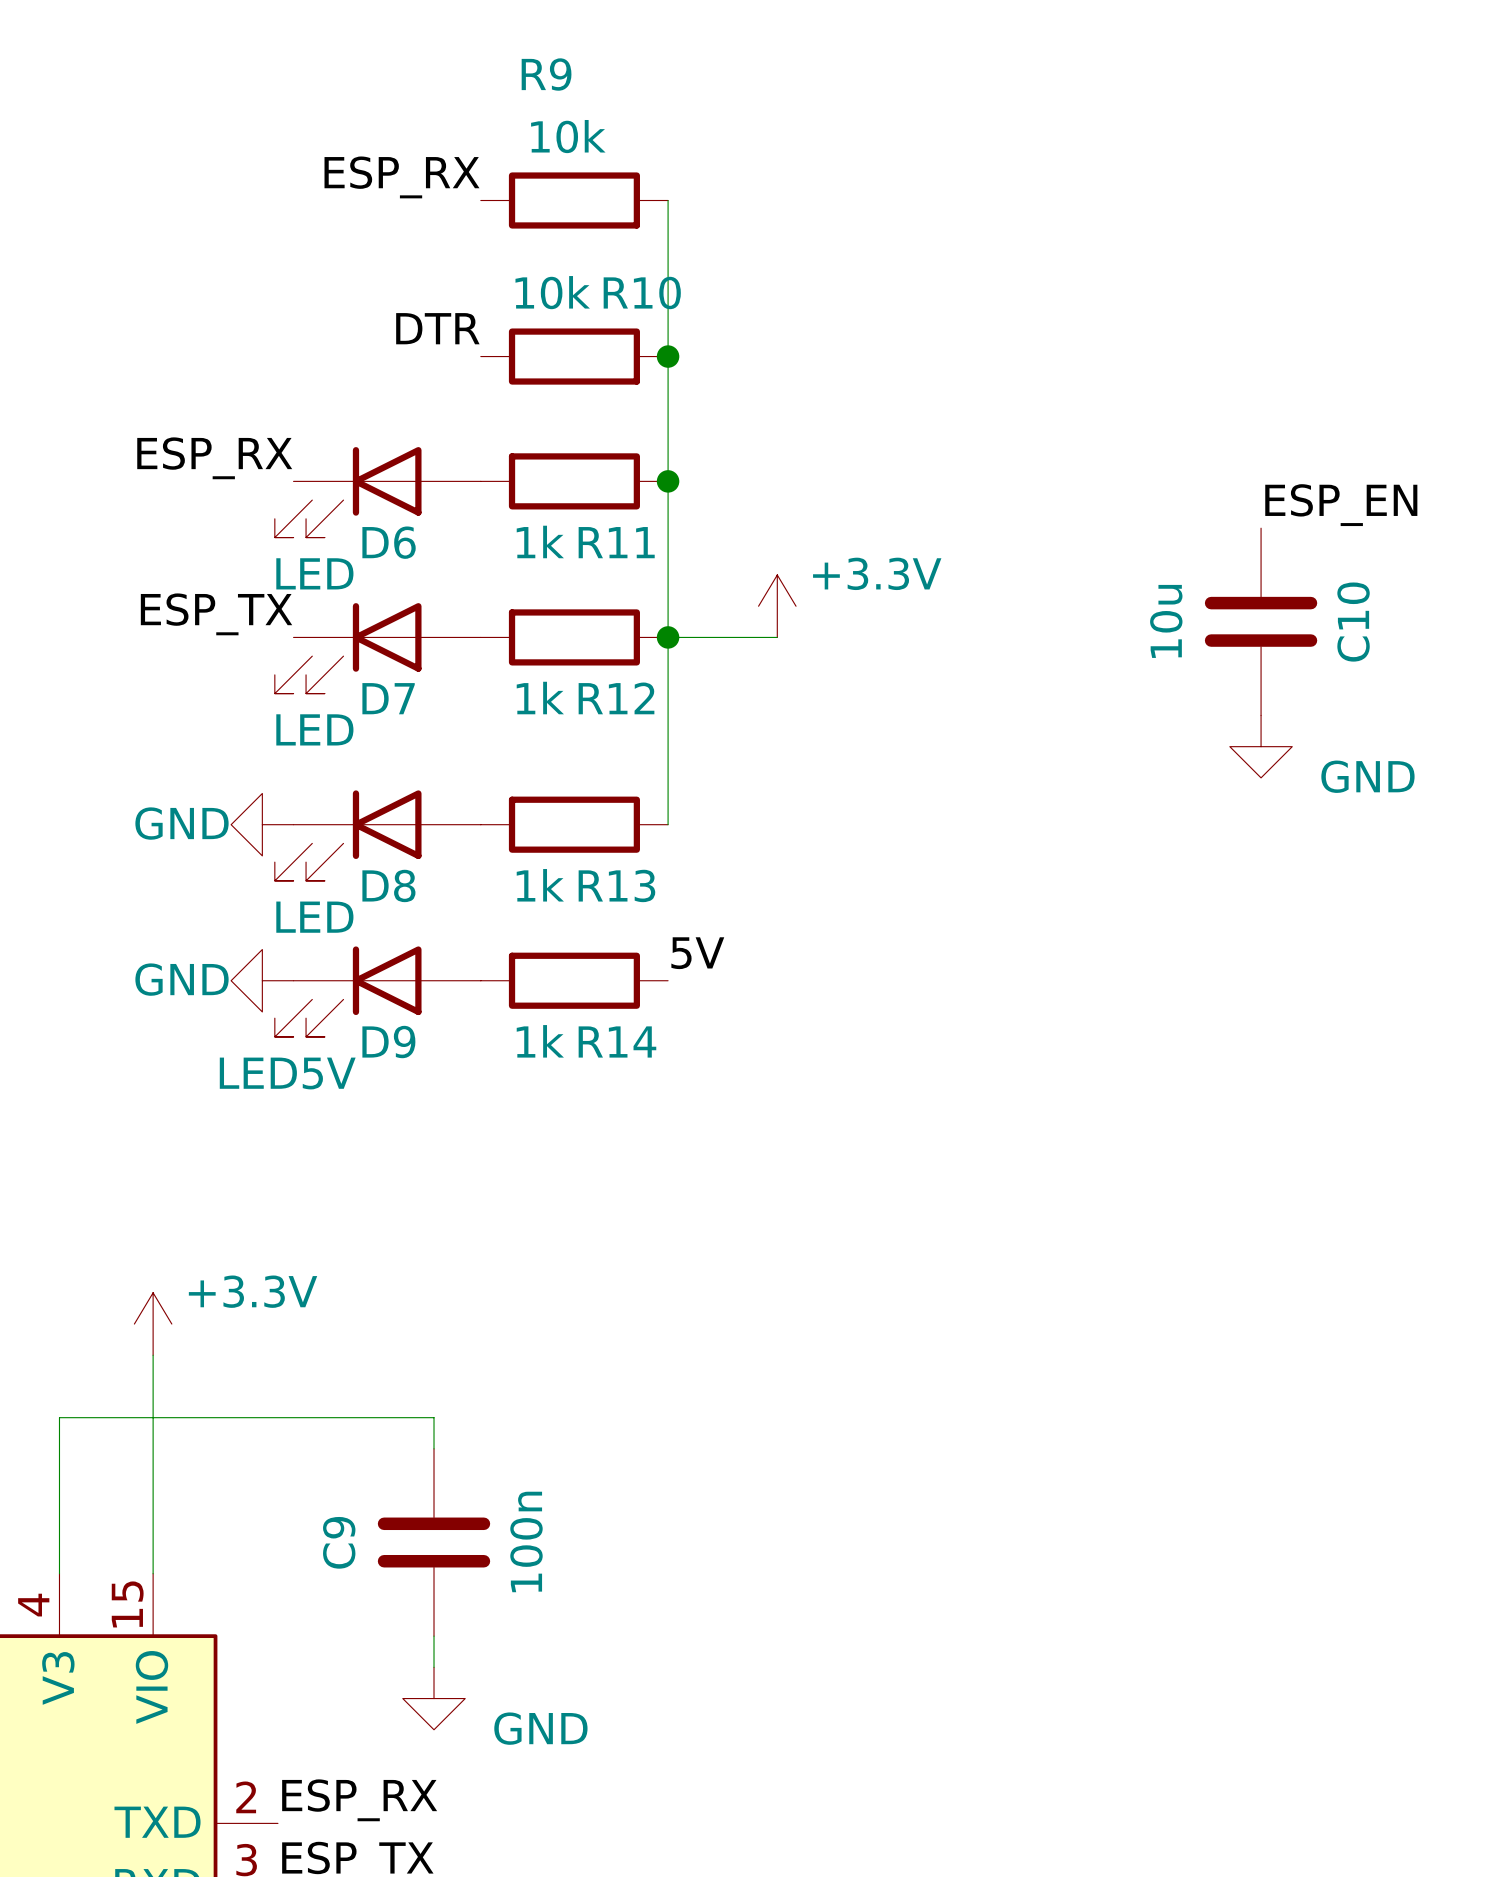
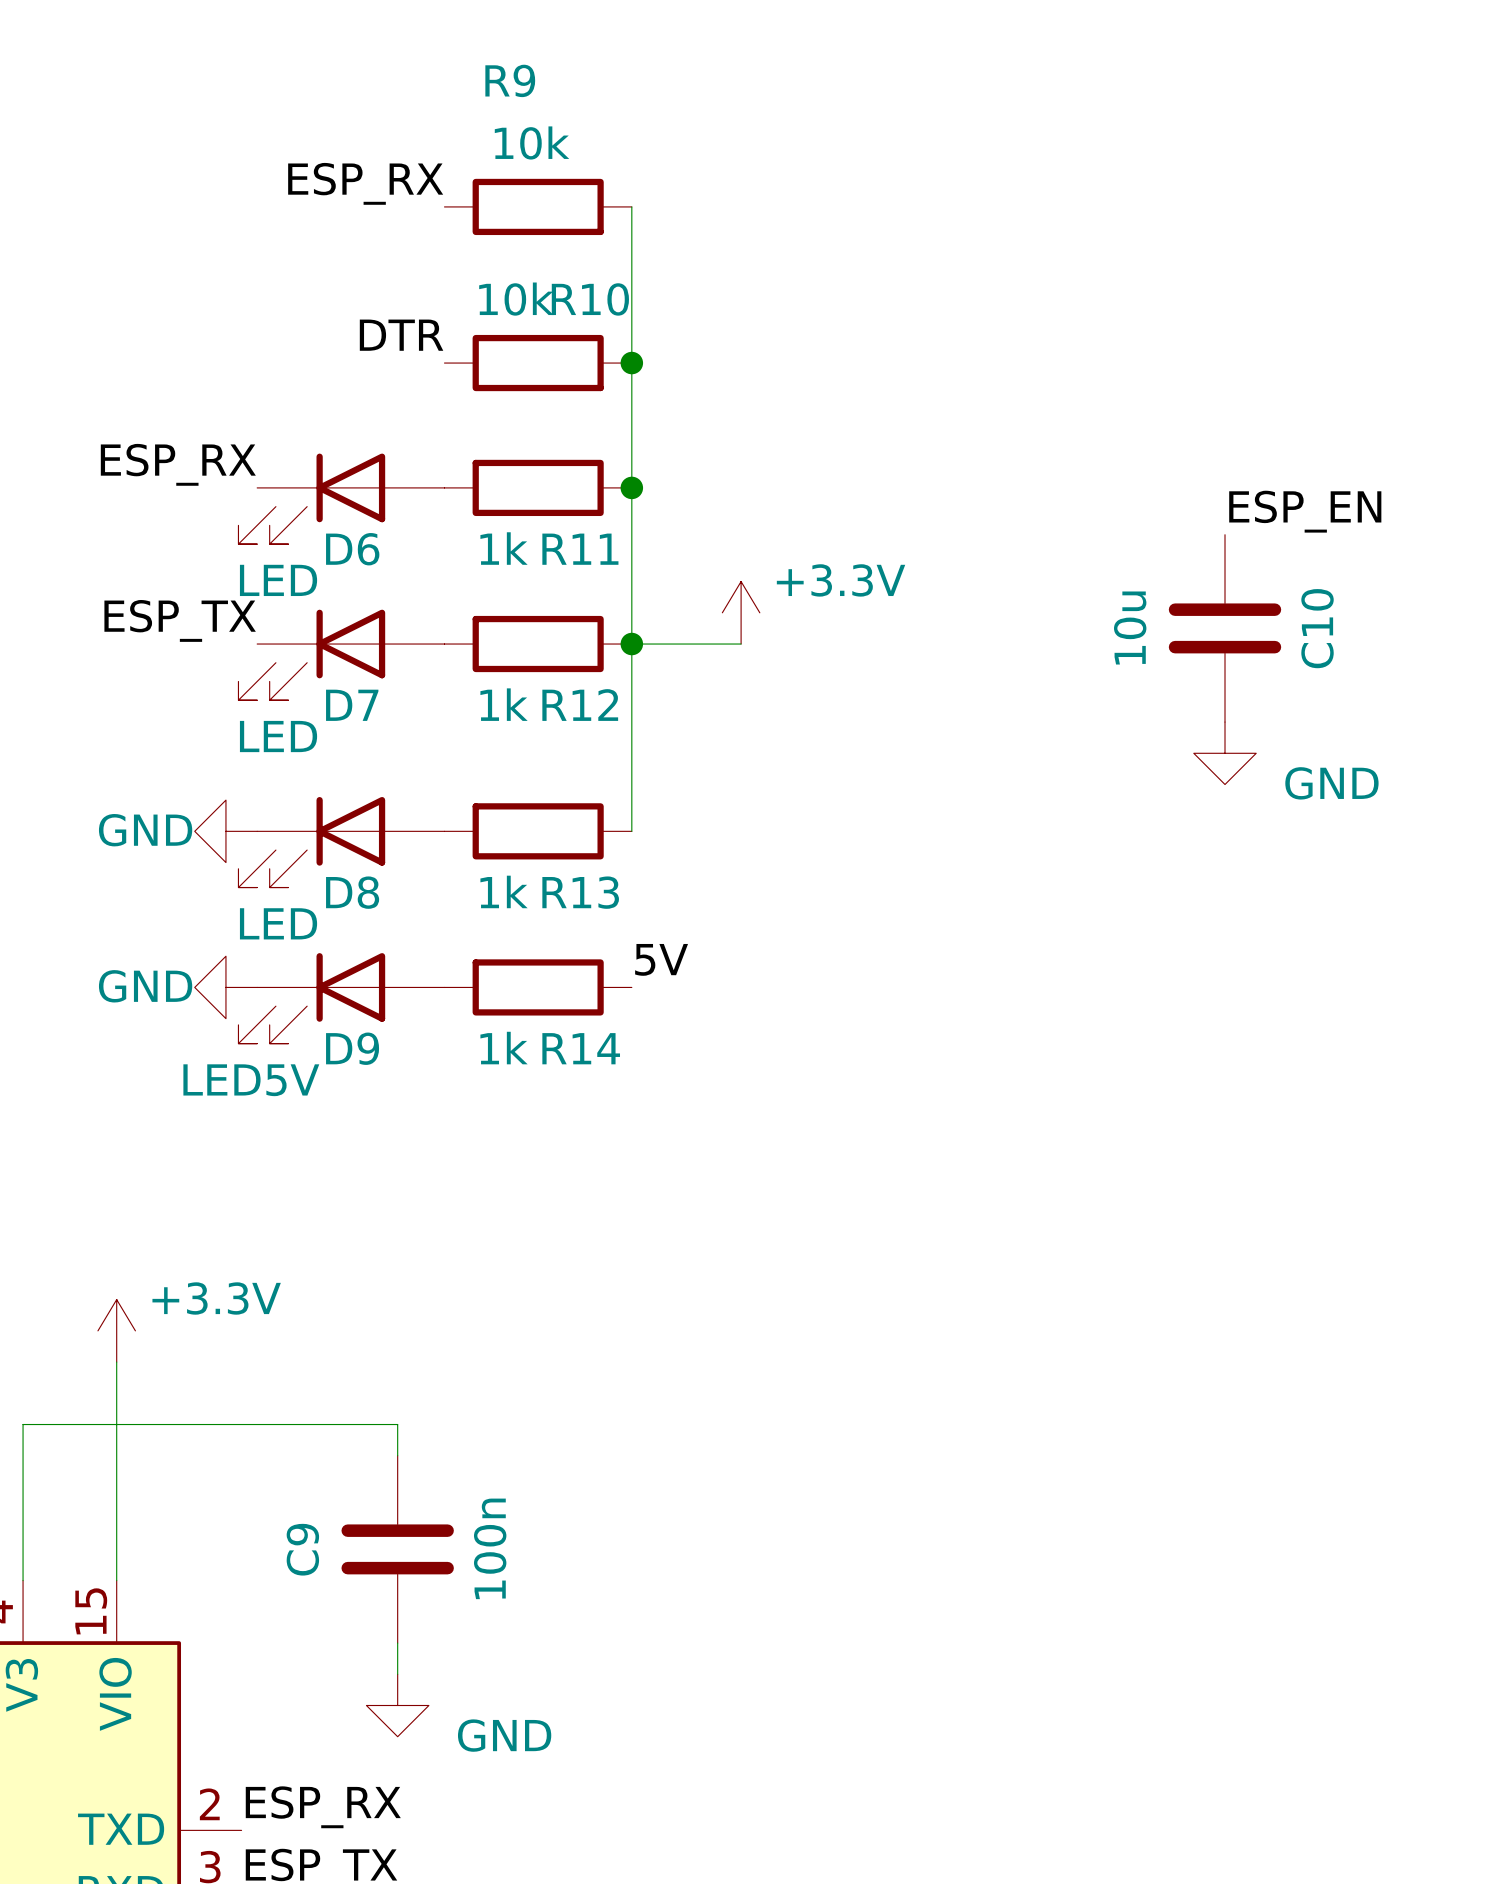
R10 name position: R10 (642, 292) -> R10 (590, 299)

